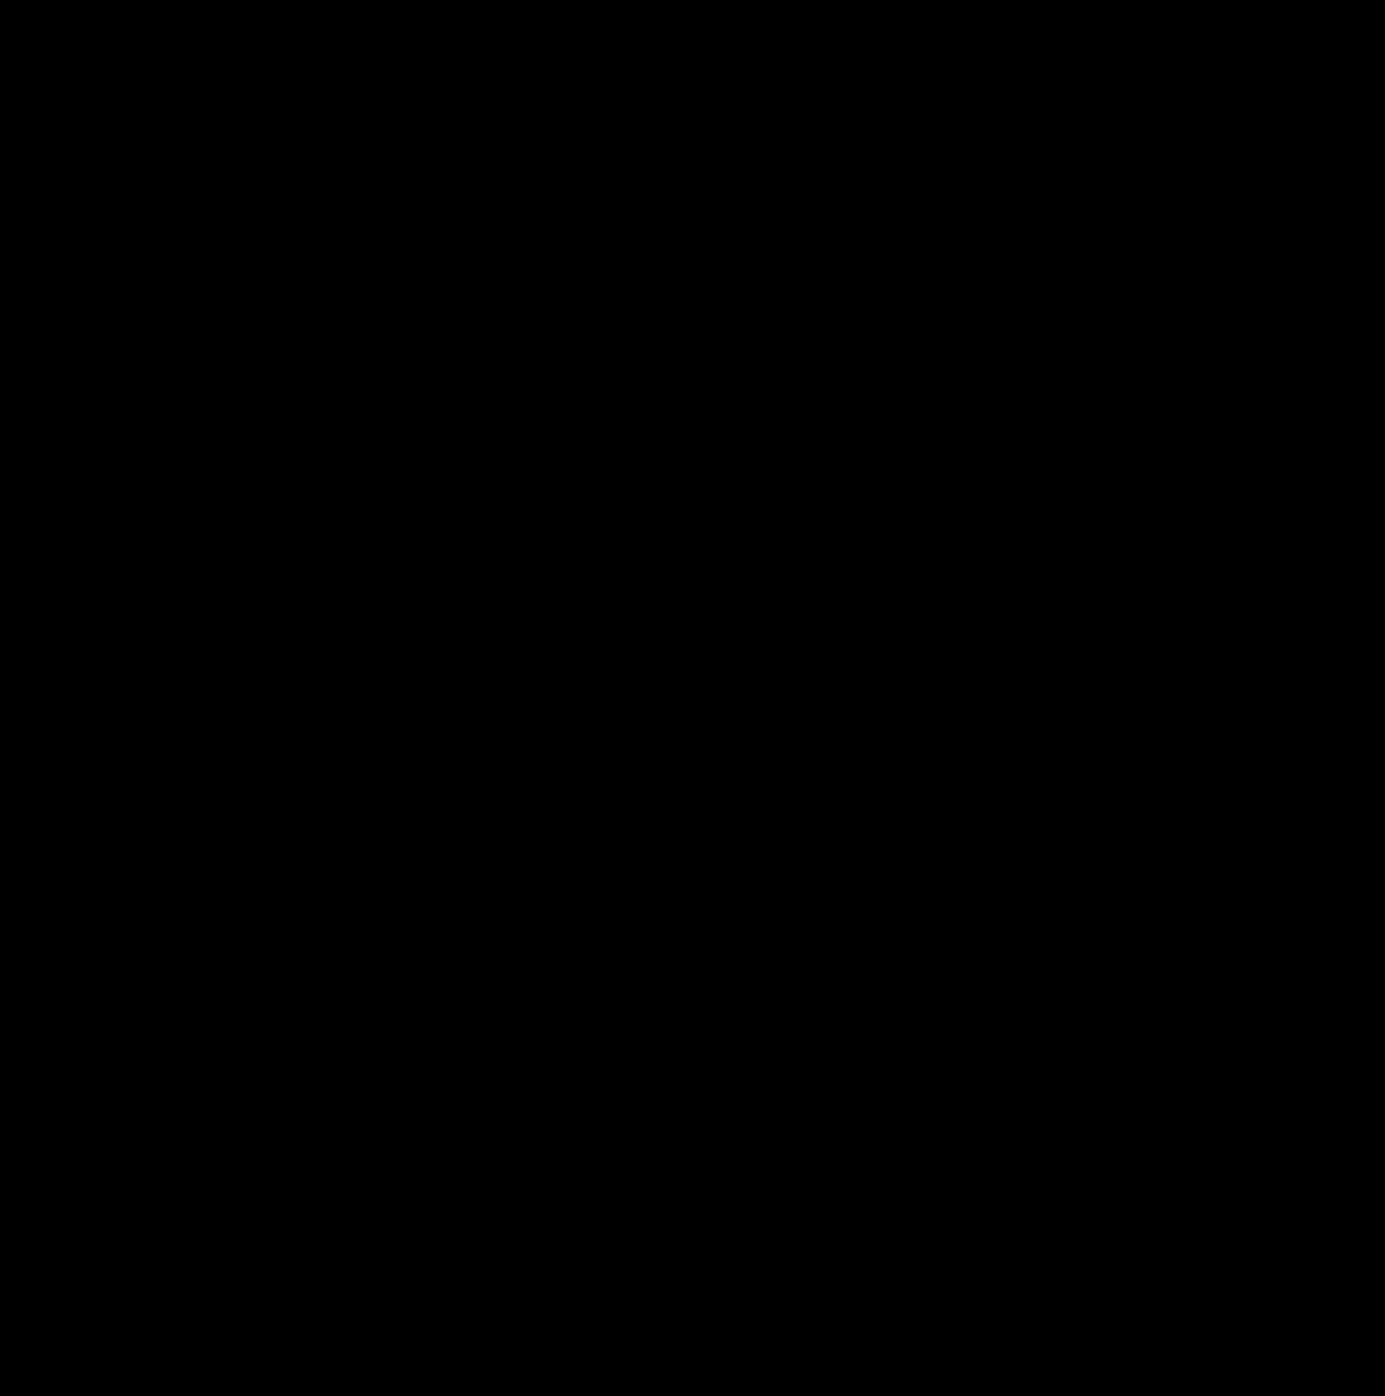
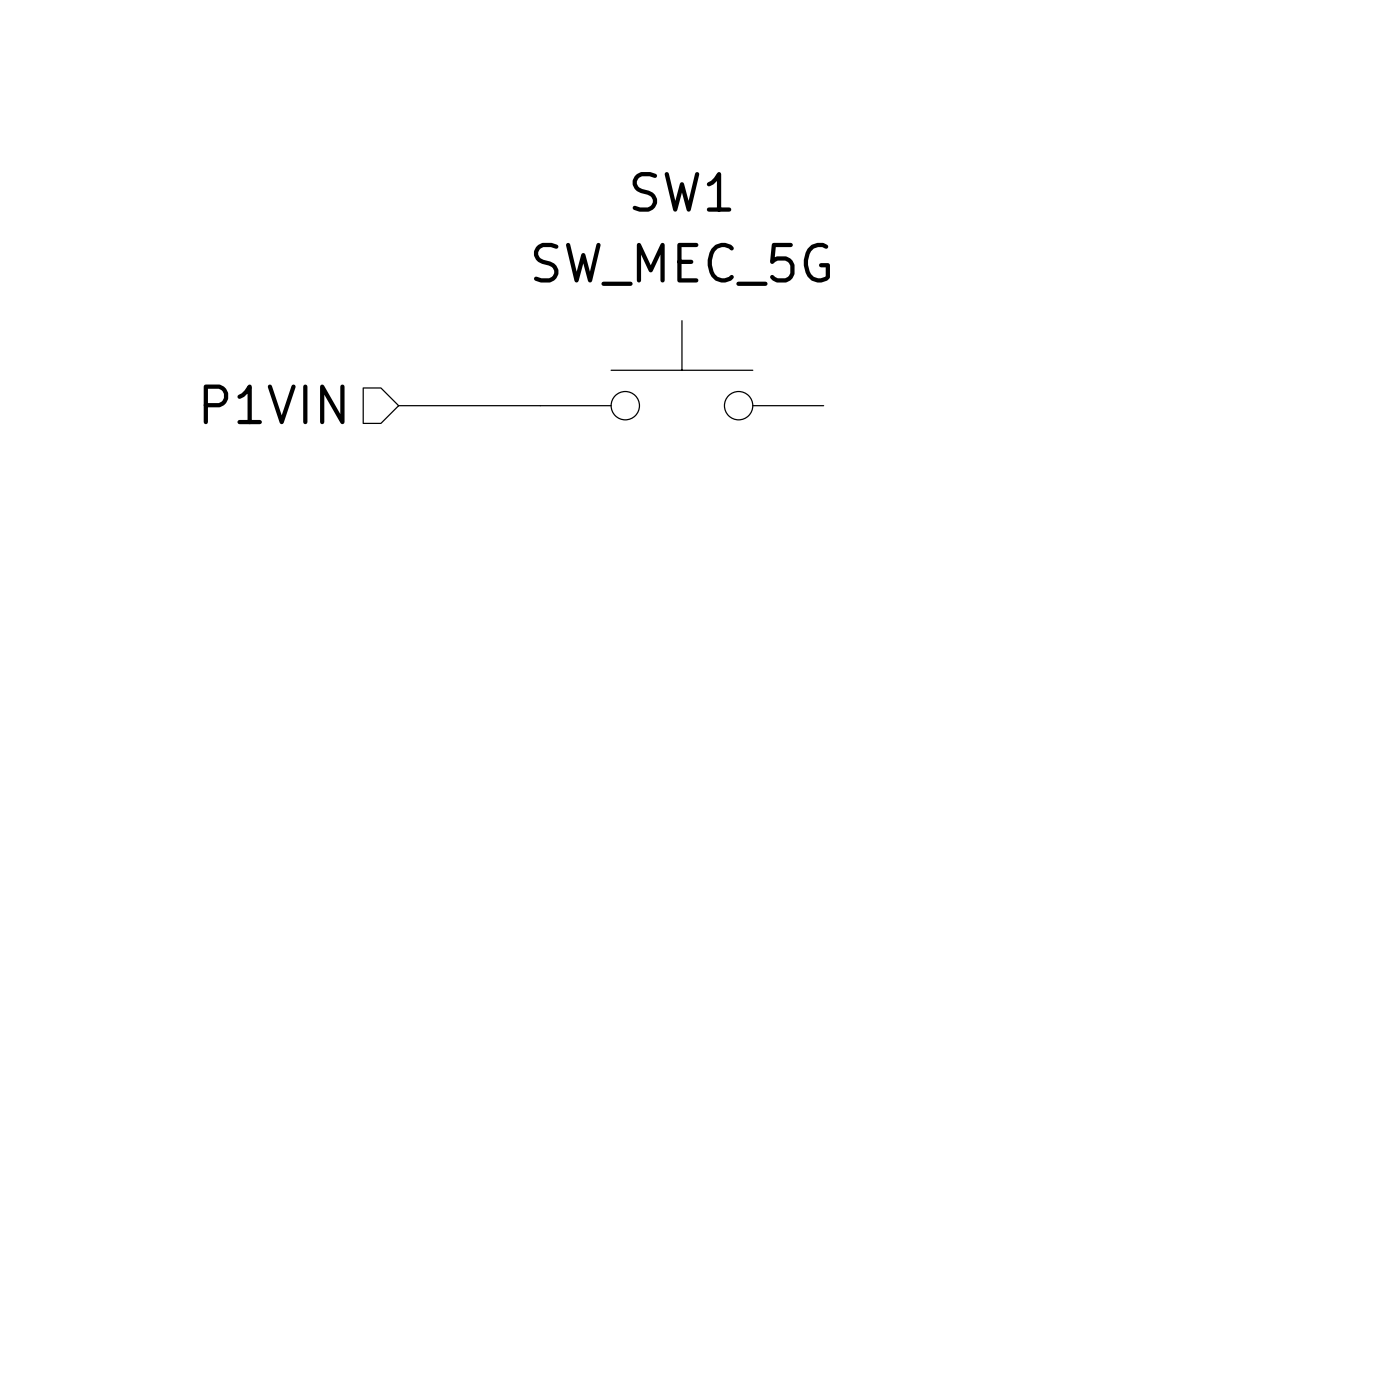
SW1: none -> SW_MEC_5G (681, 370)
hierarchical label: none -> P1VIN (274, 404)
wire: none -> (398, 405) (540, 405)

